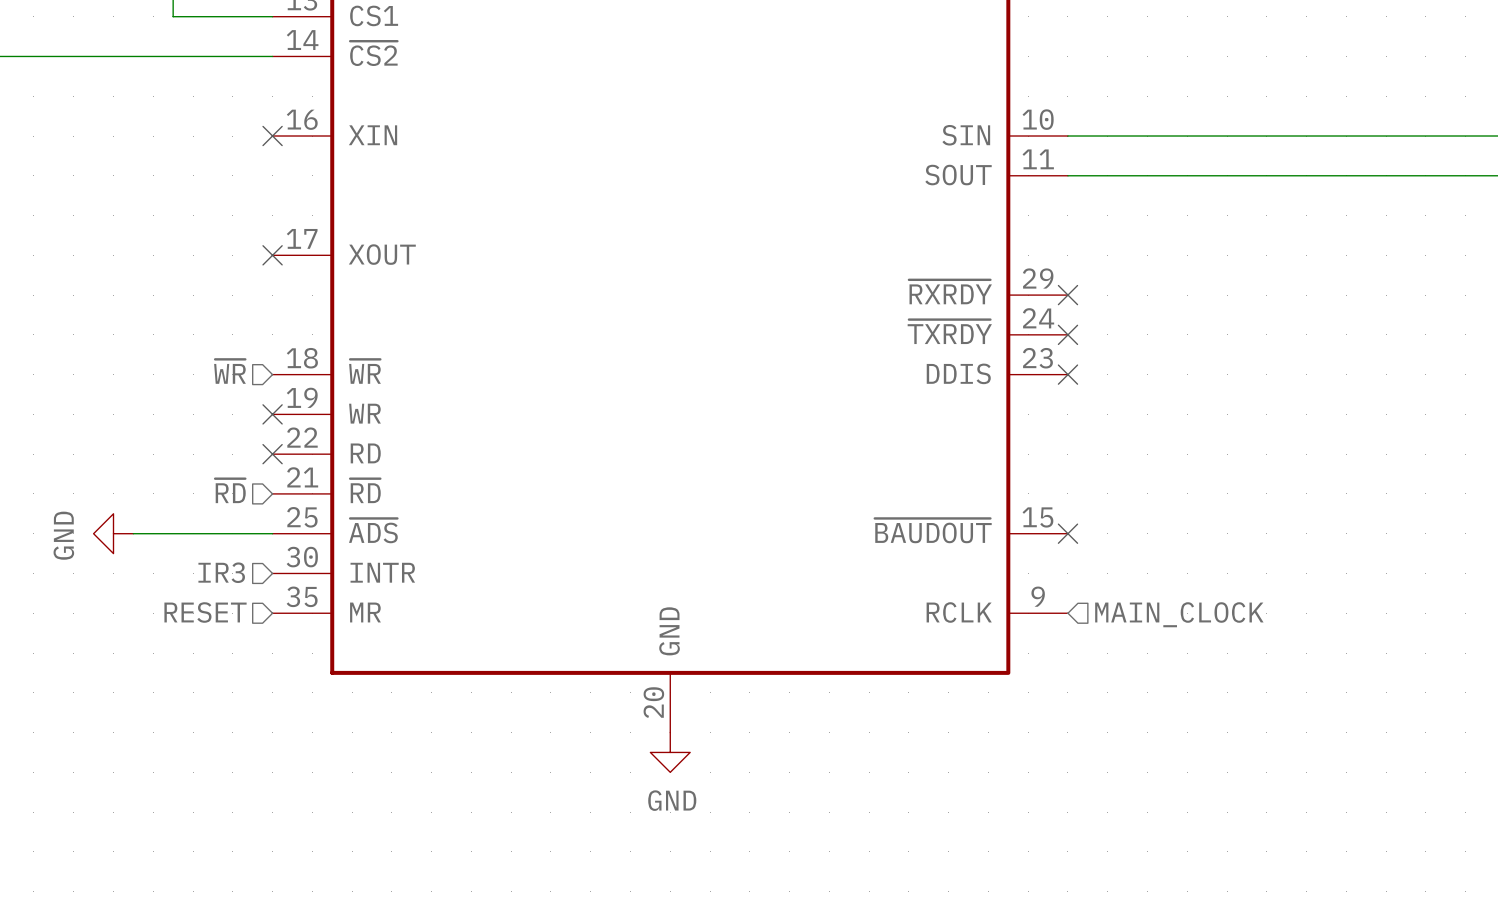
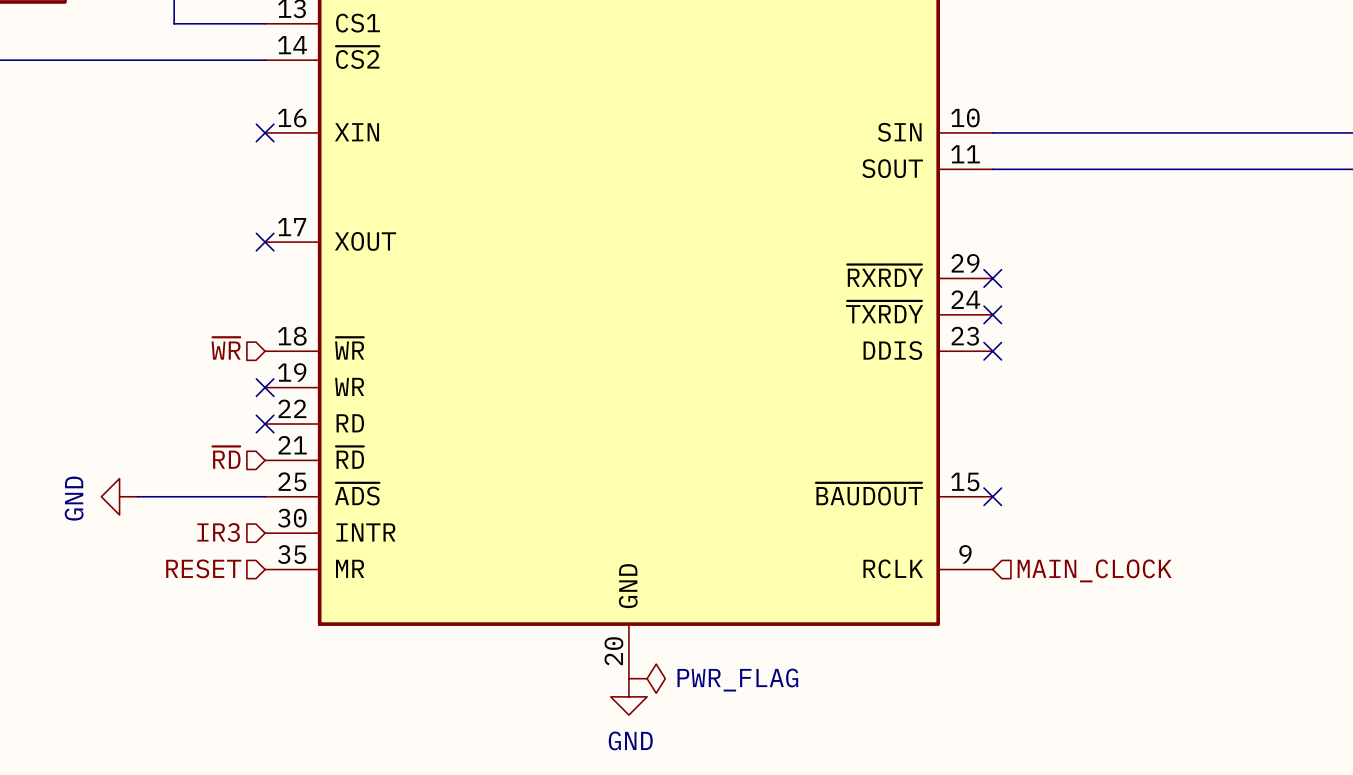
power symbol: none -> PWR_FLAG (647, 678)

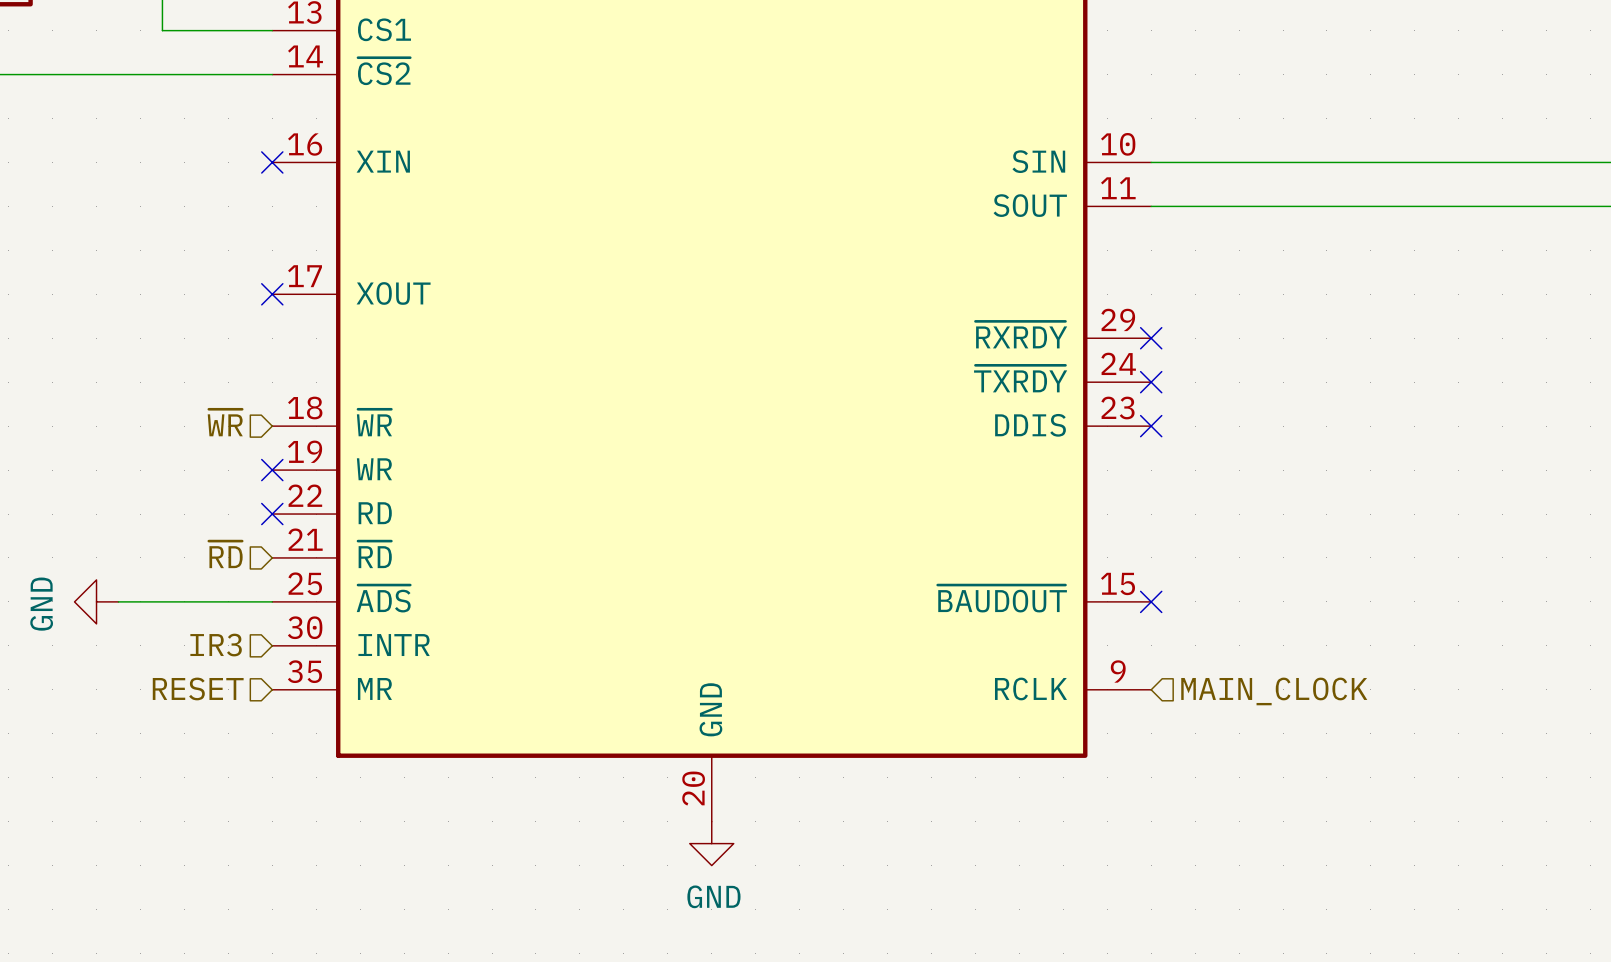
power symbol: PWR_FLAG (647, 678) -> none

